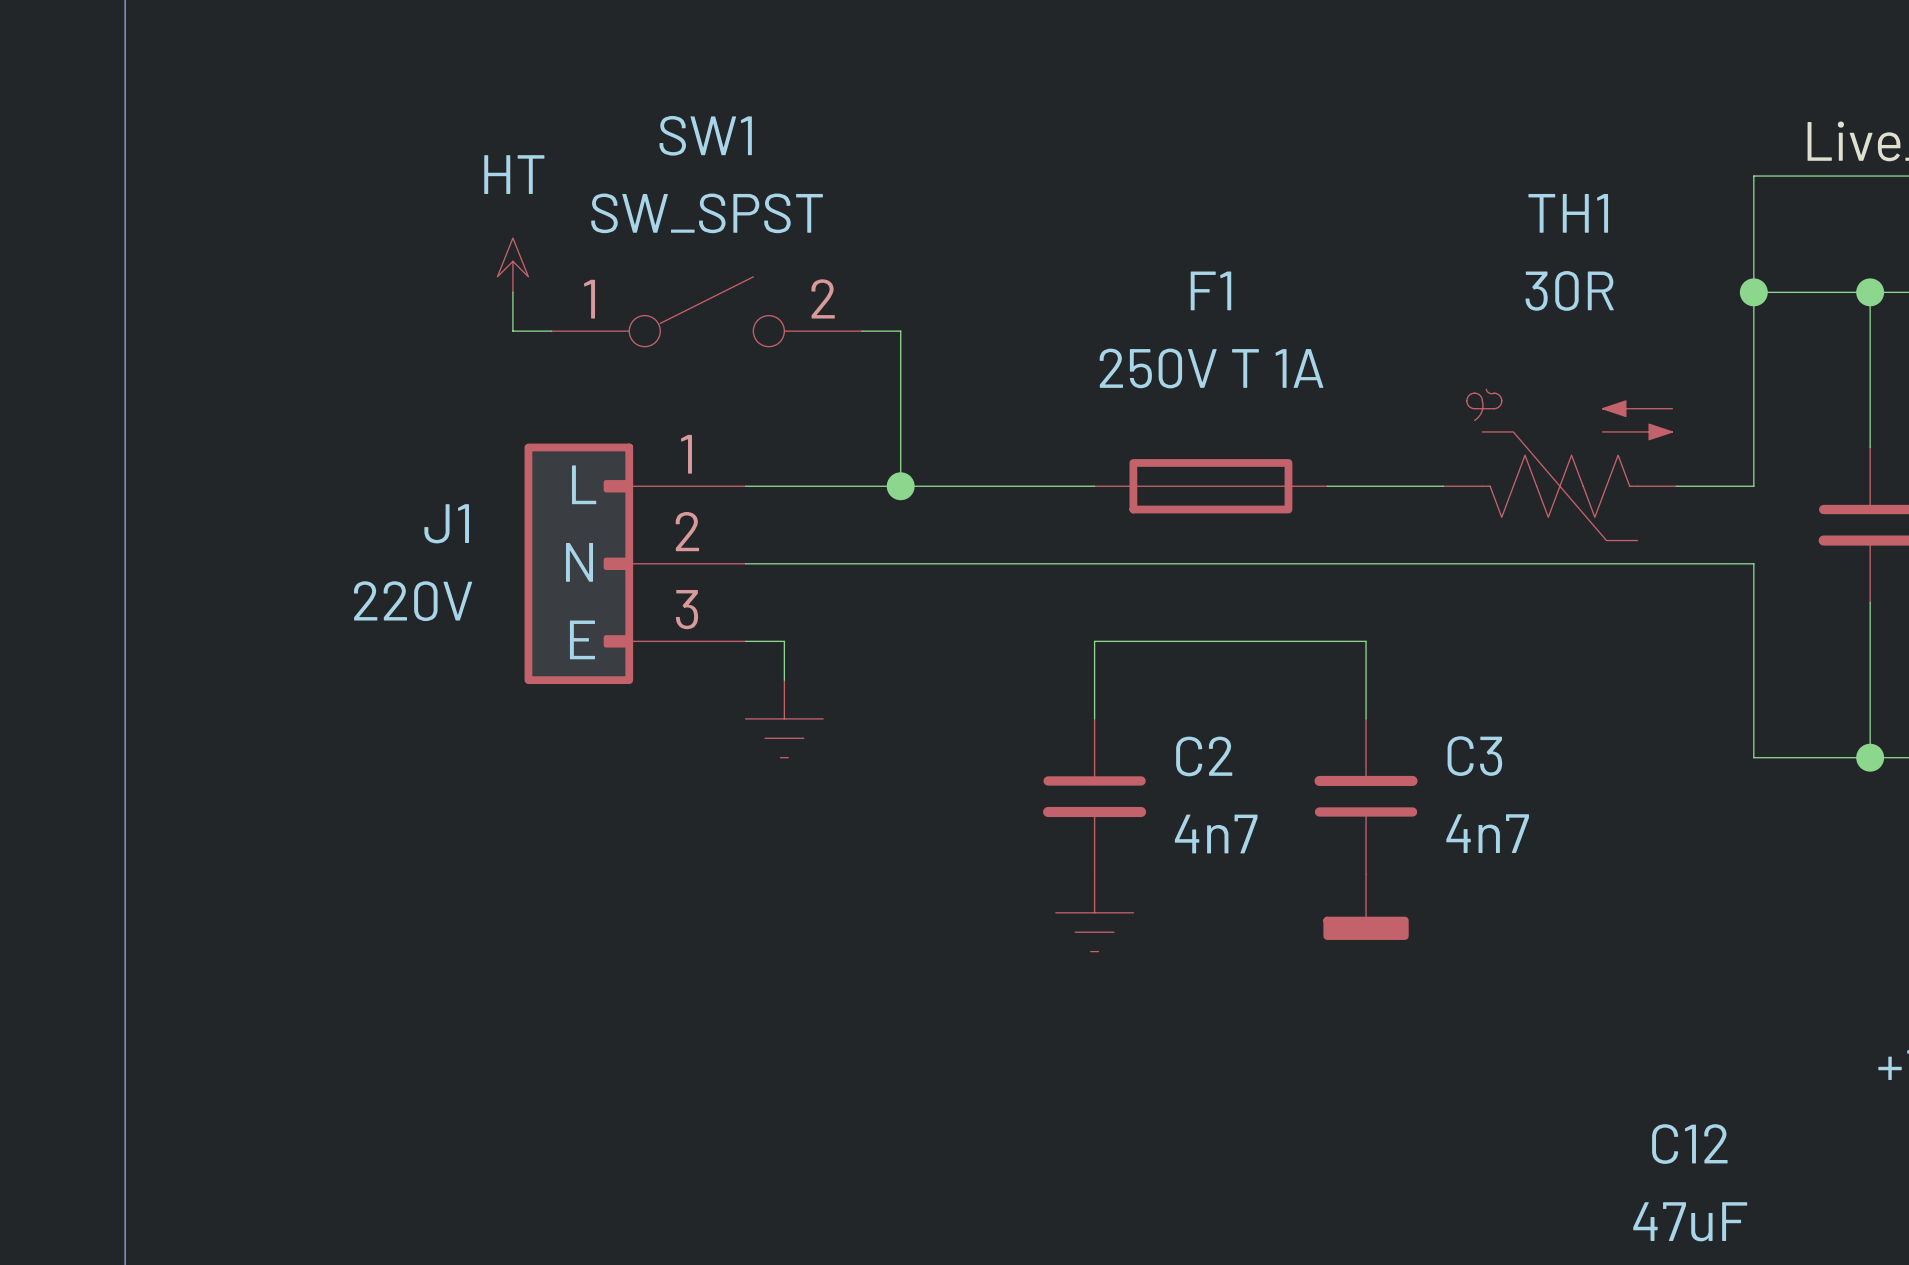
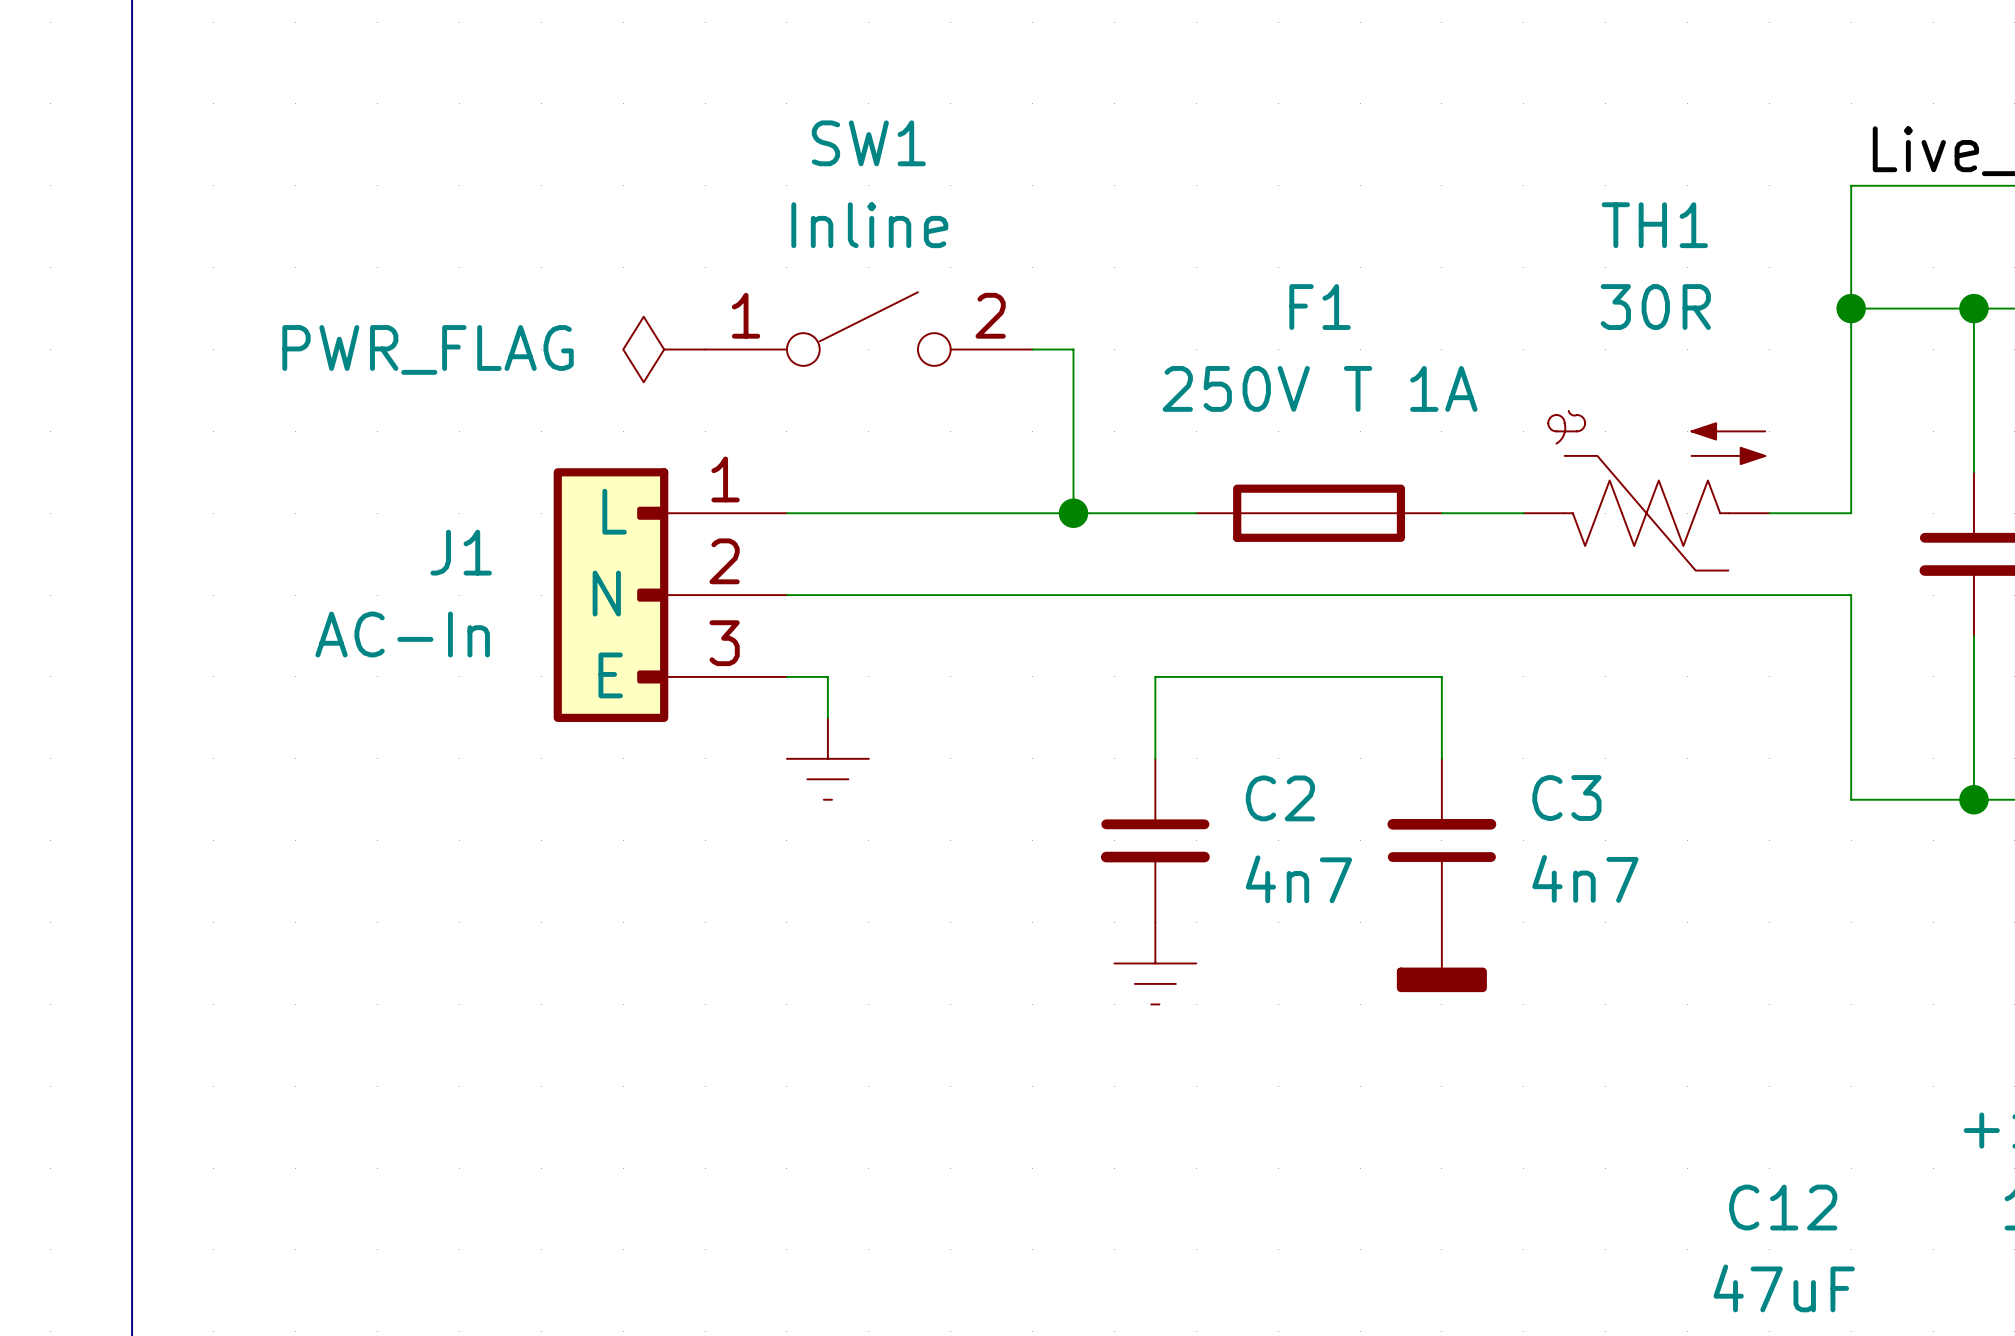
SW1 value: SW_SPST (707, 213) -> Inline (869, 225)
power symbol: HT (512, 265) -> none
wire: (512, 292) (512, 331) (551, 331) -> none
SW1 position: (706, 311) -> (868, 329)
power symbol: none -> PWR_FLAG (664, 349)
wire: (861, 331) (900, 331) (900, 486) -> (1032, 349) (1073, 349) (1073, 513)
junction position: (900, 486) -> (1073, 513)
F1 position: (1210, 486) -> (1319, 513)
J1 value: 220V (413, 601) -> AC-In (402, 634)

